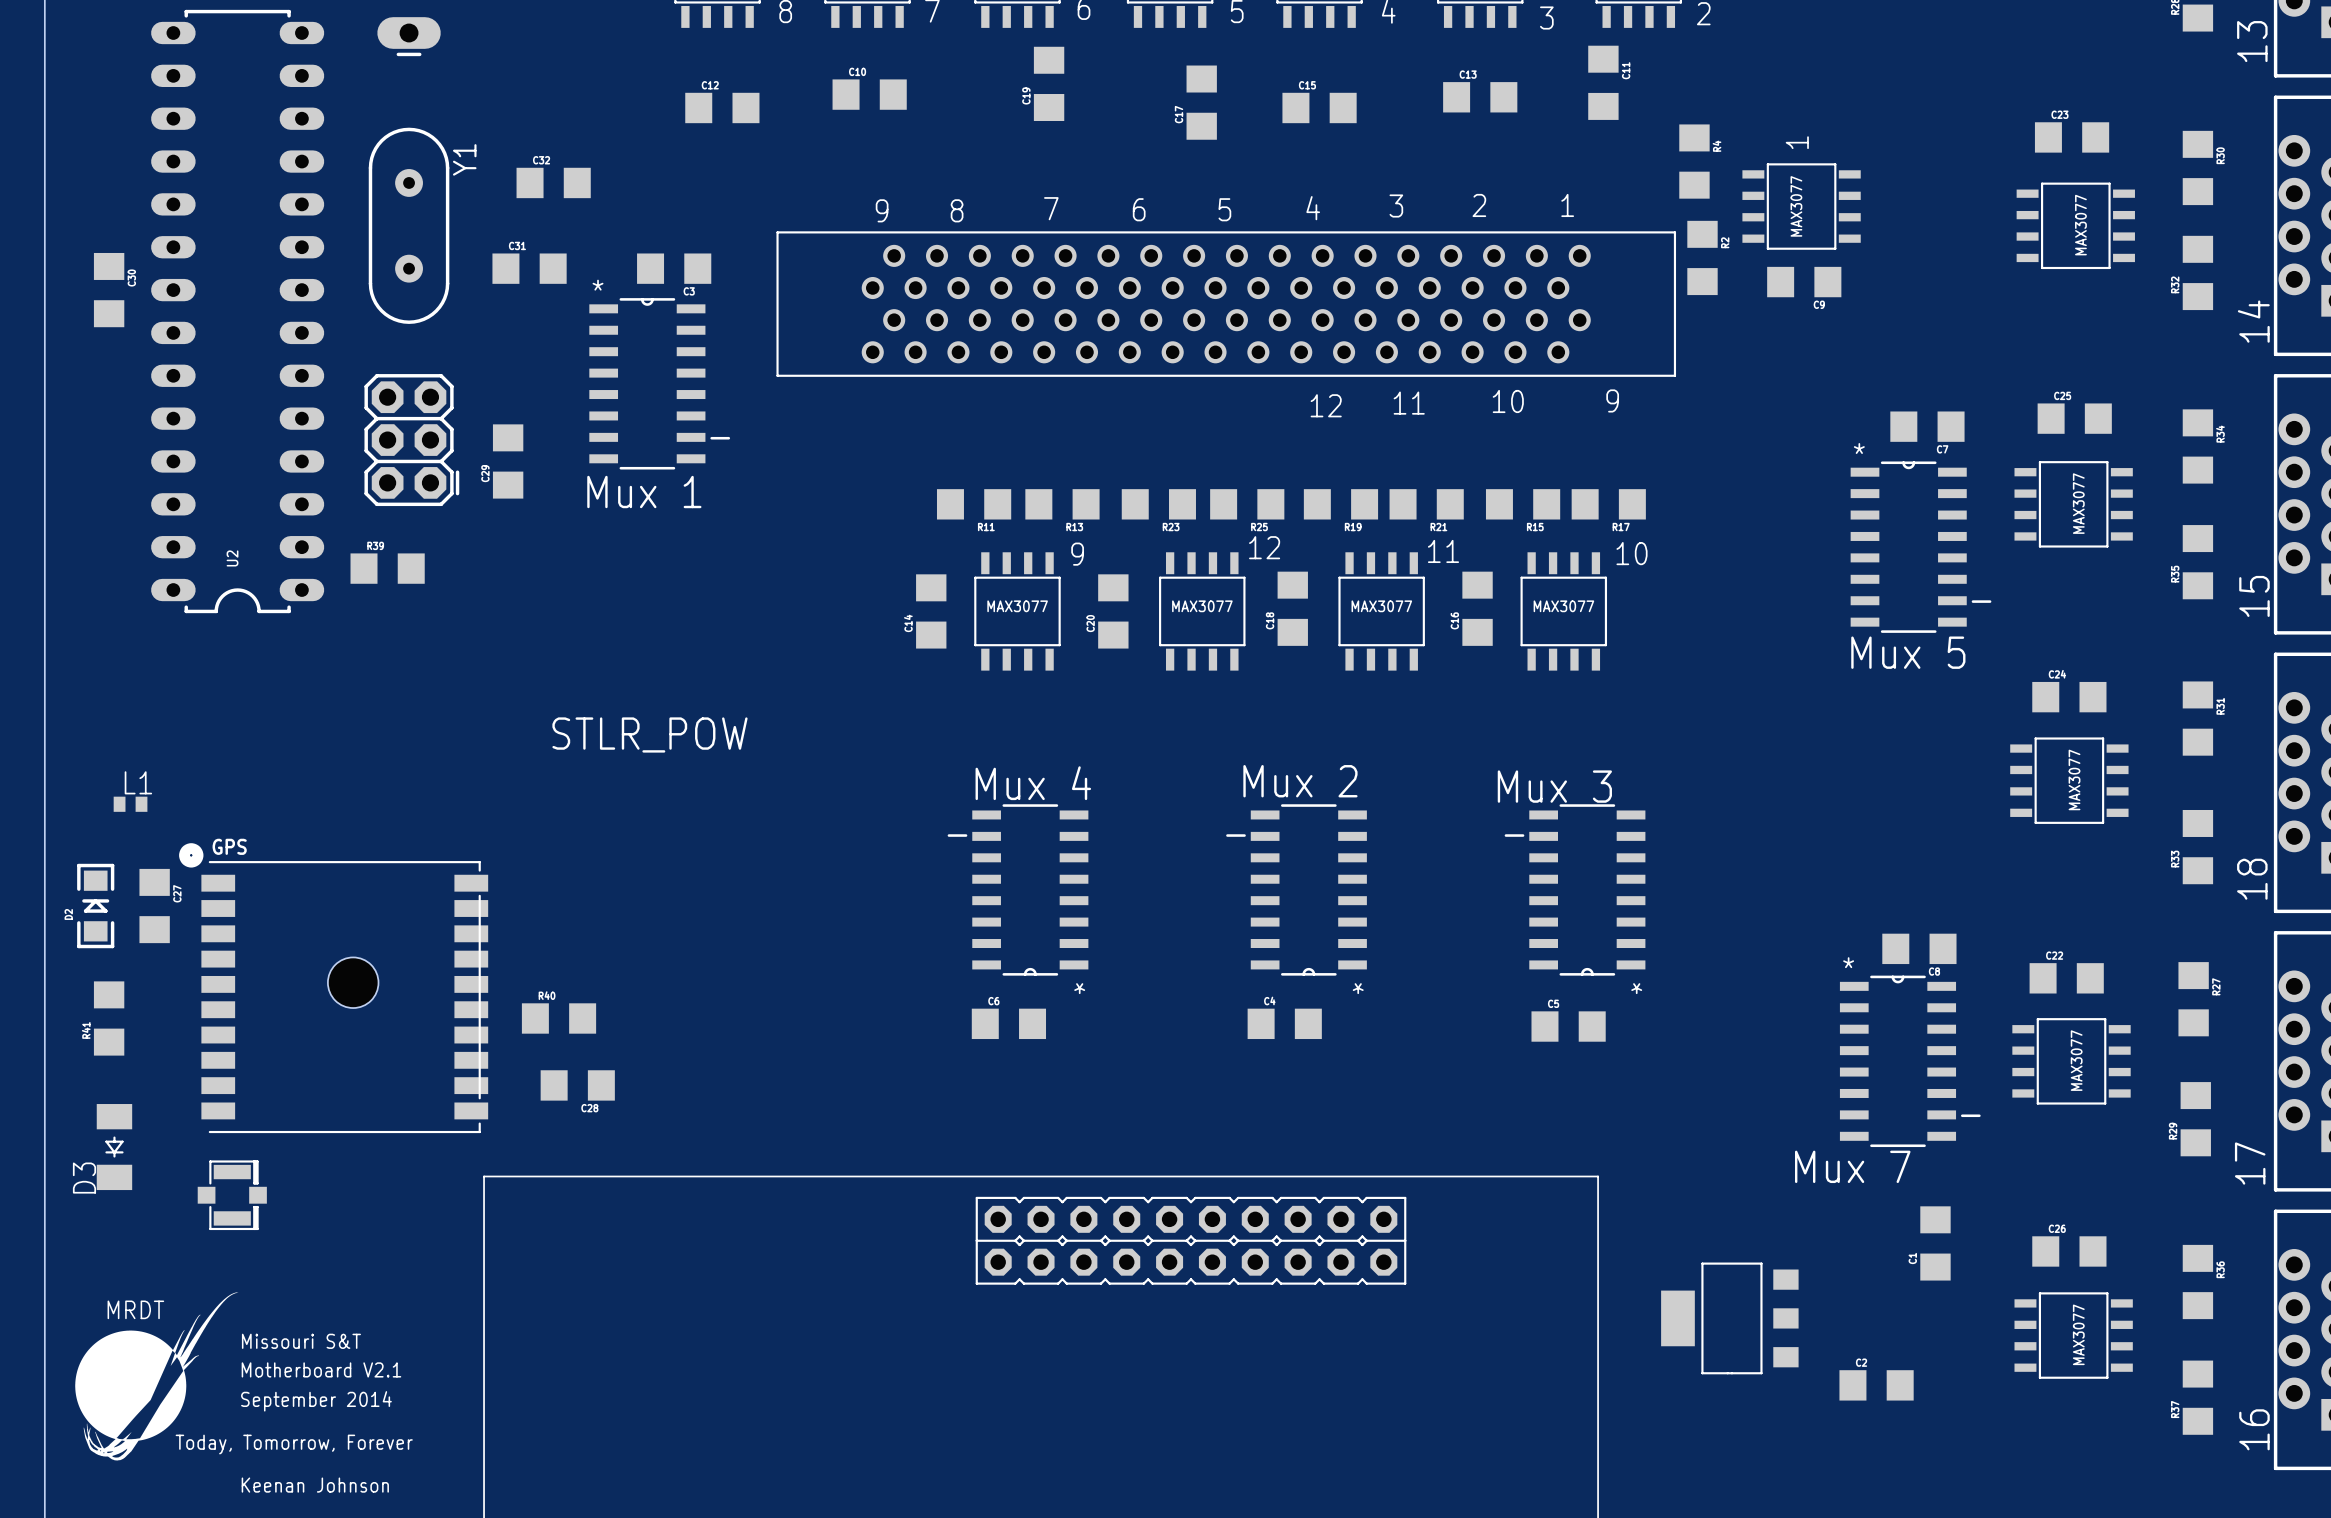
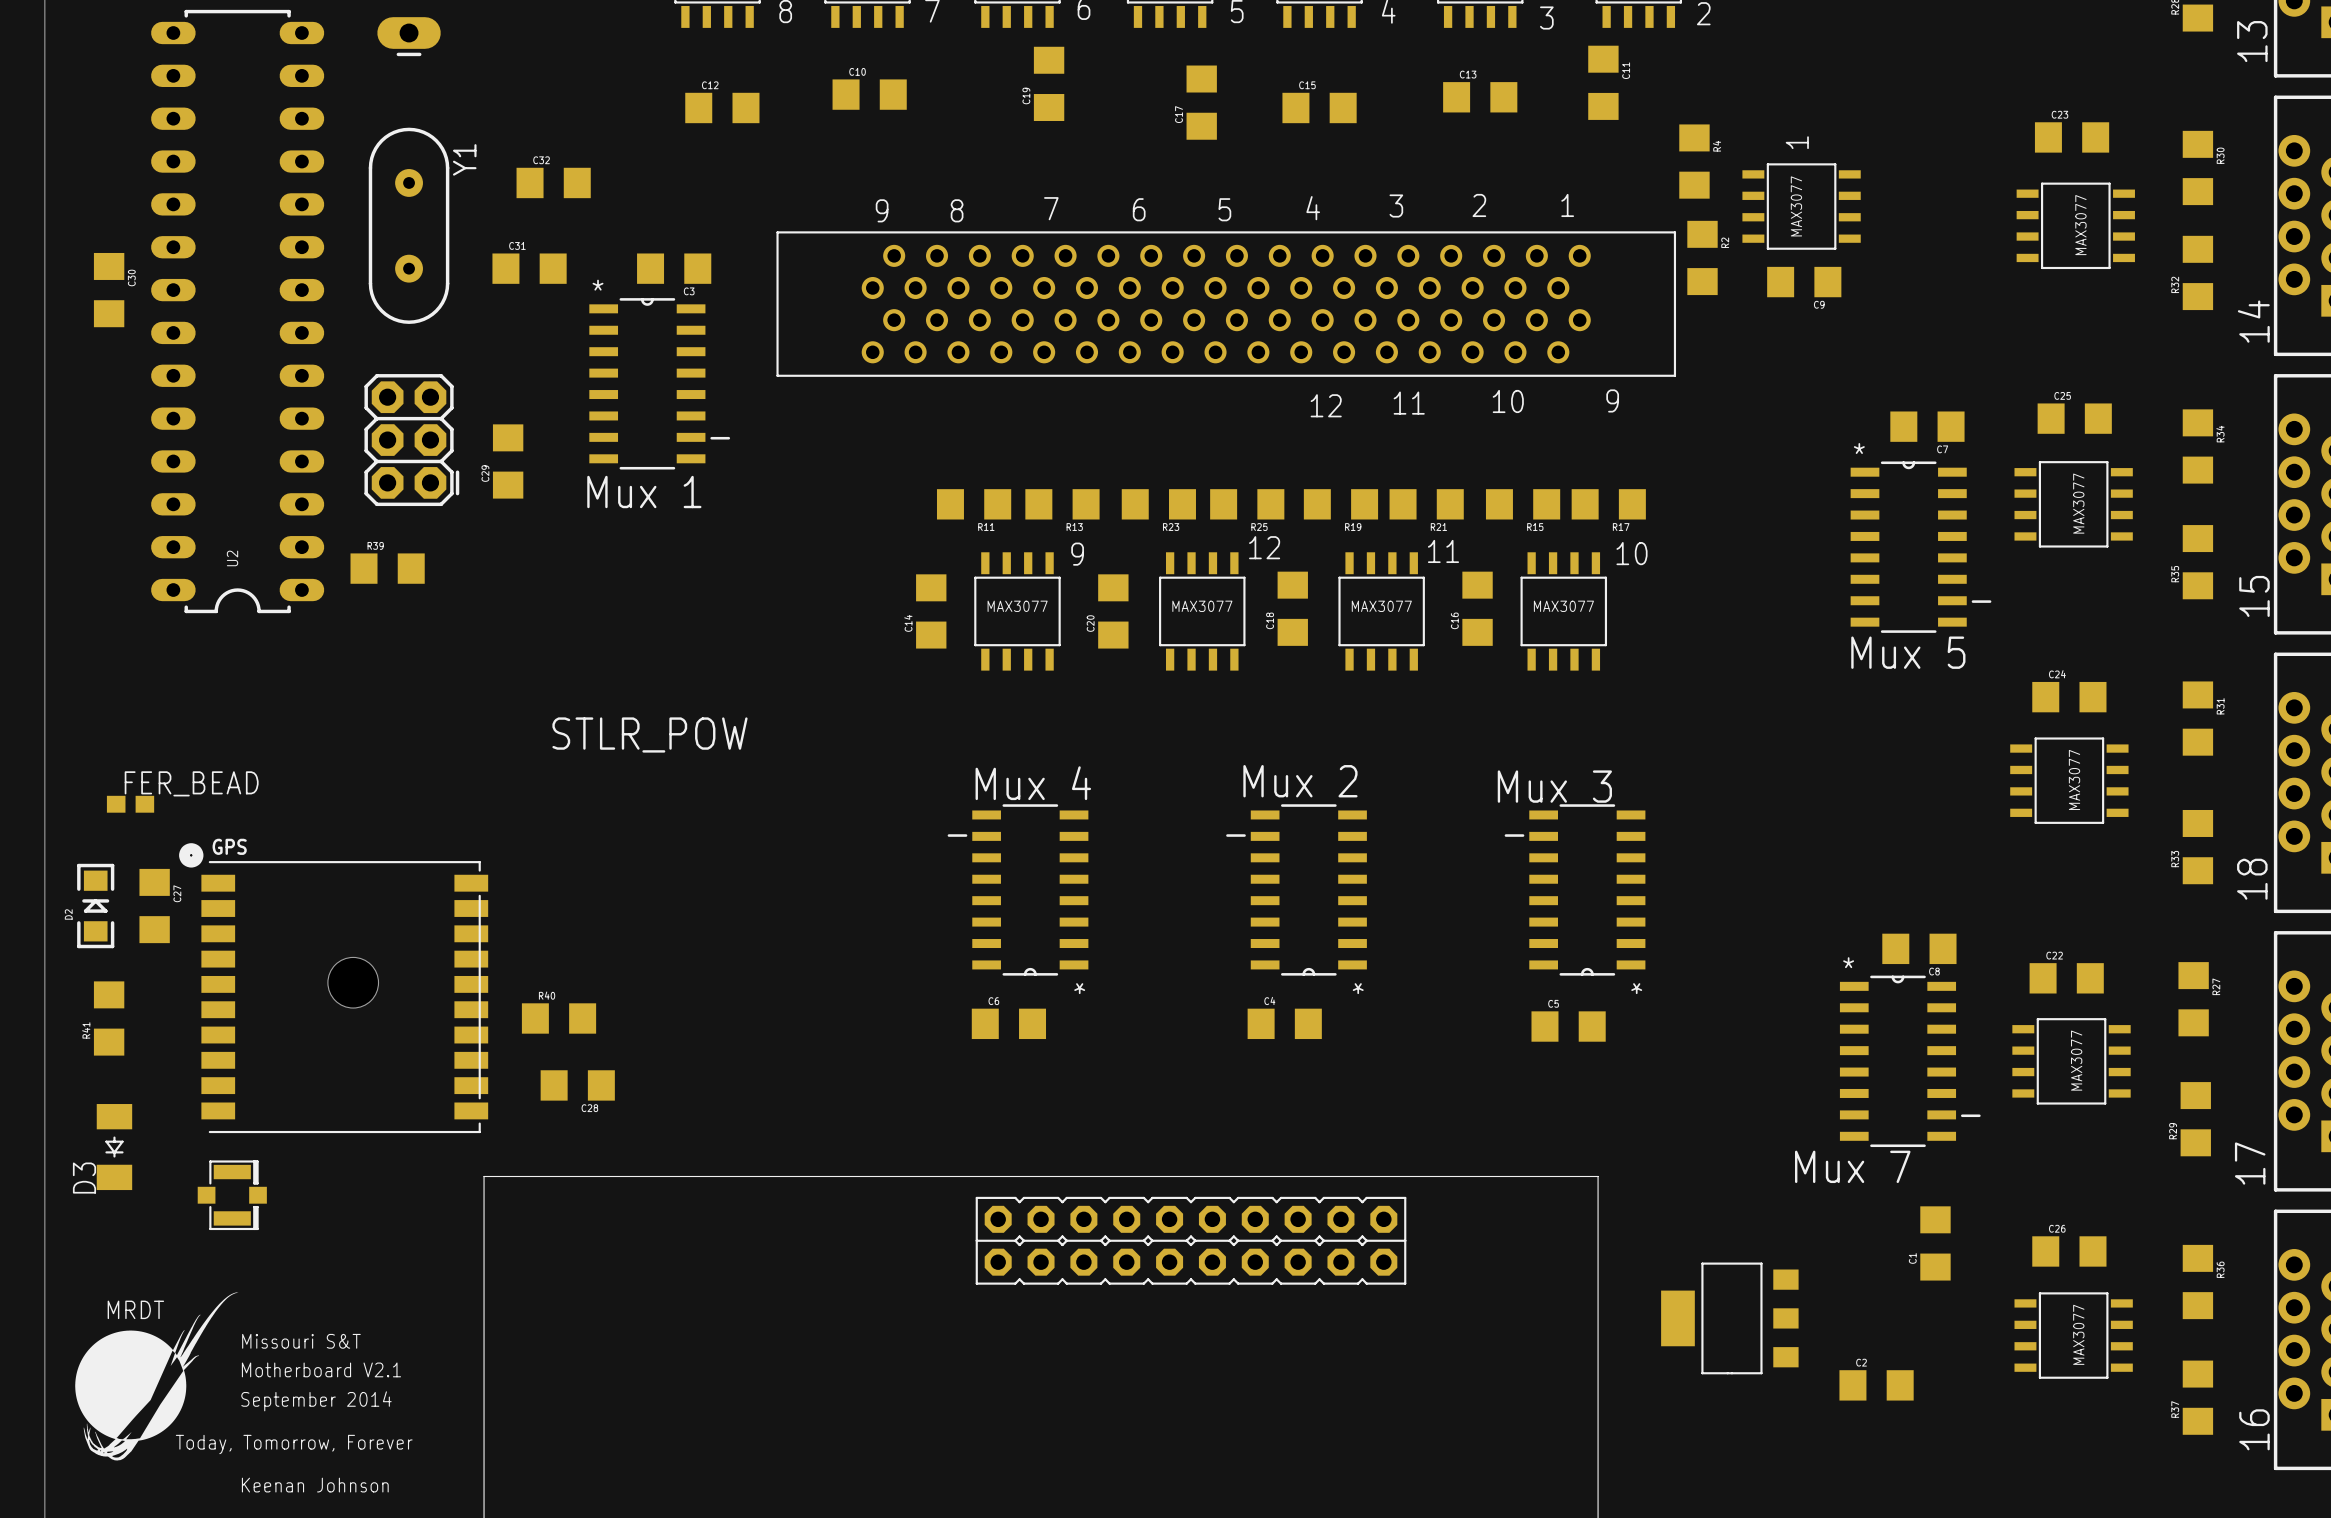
L1: (130, 804) -> none
FER_BEAD: none -> (130, 804)

